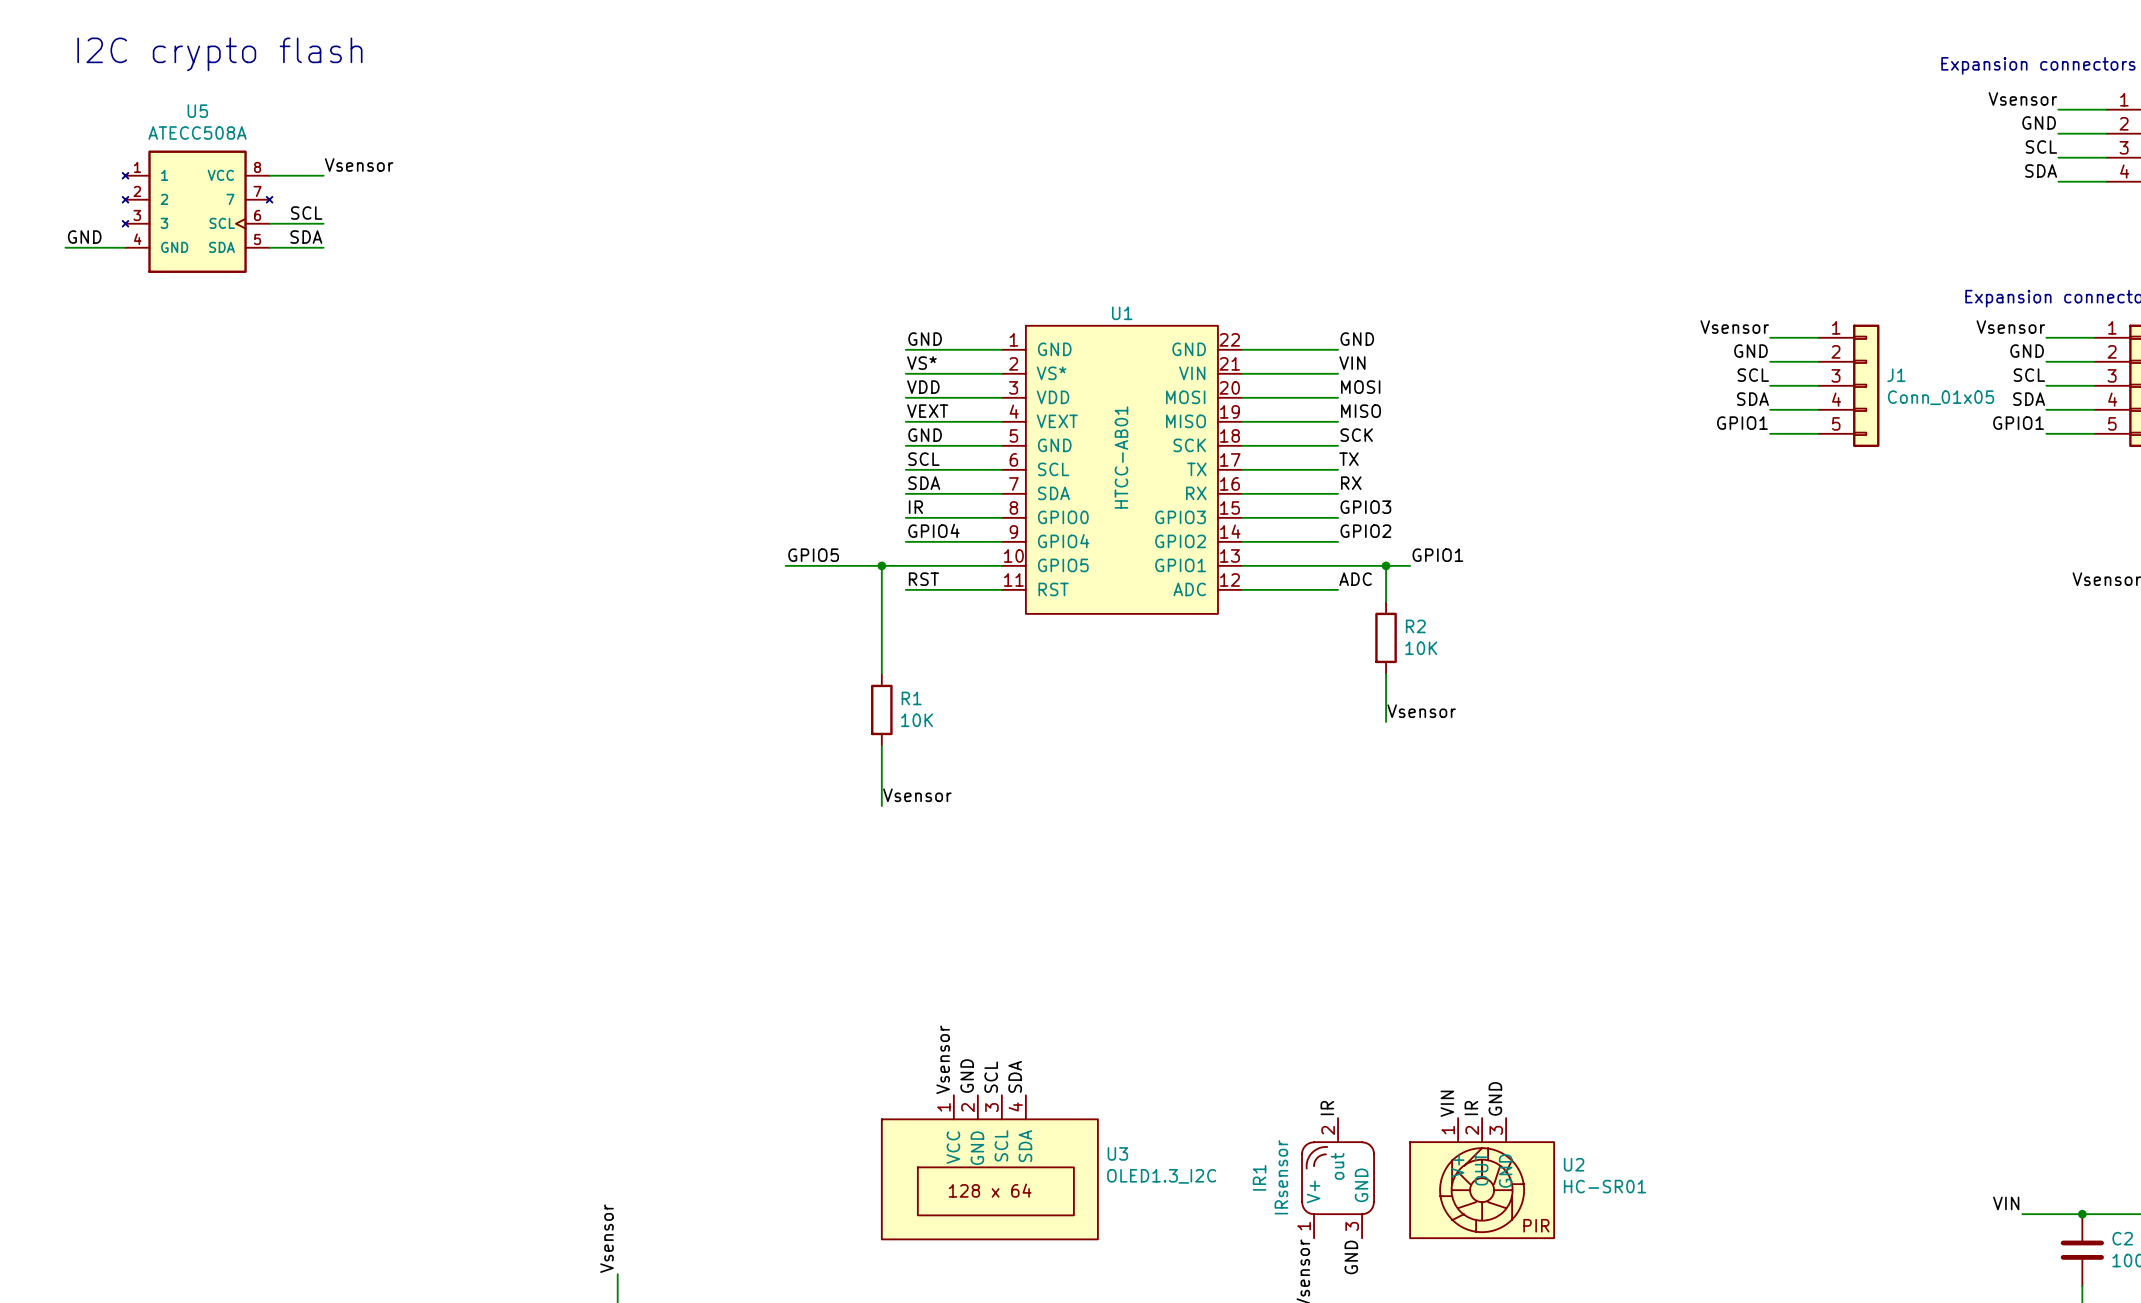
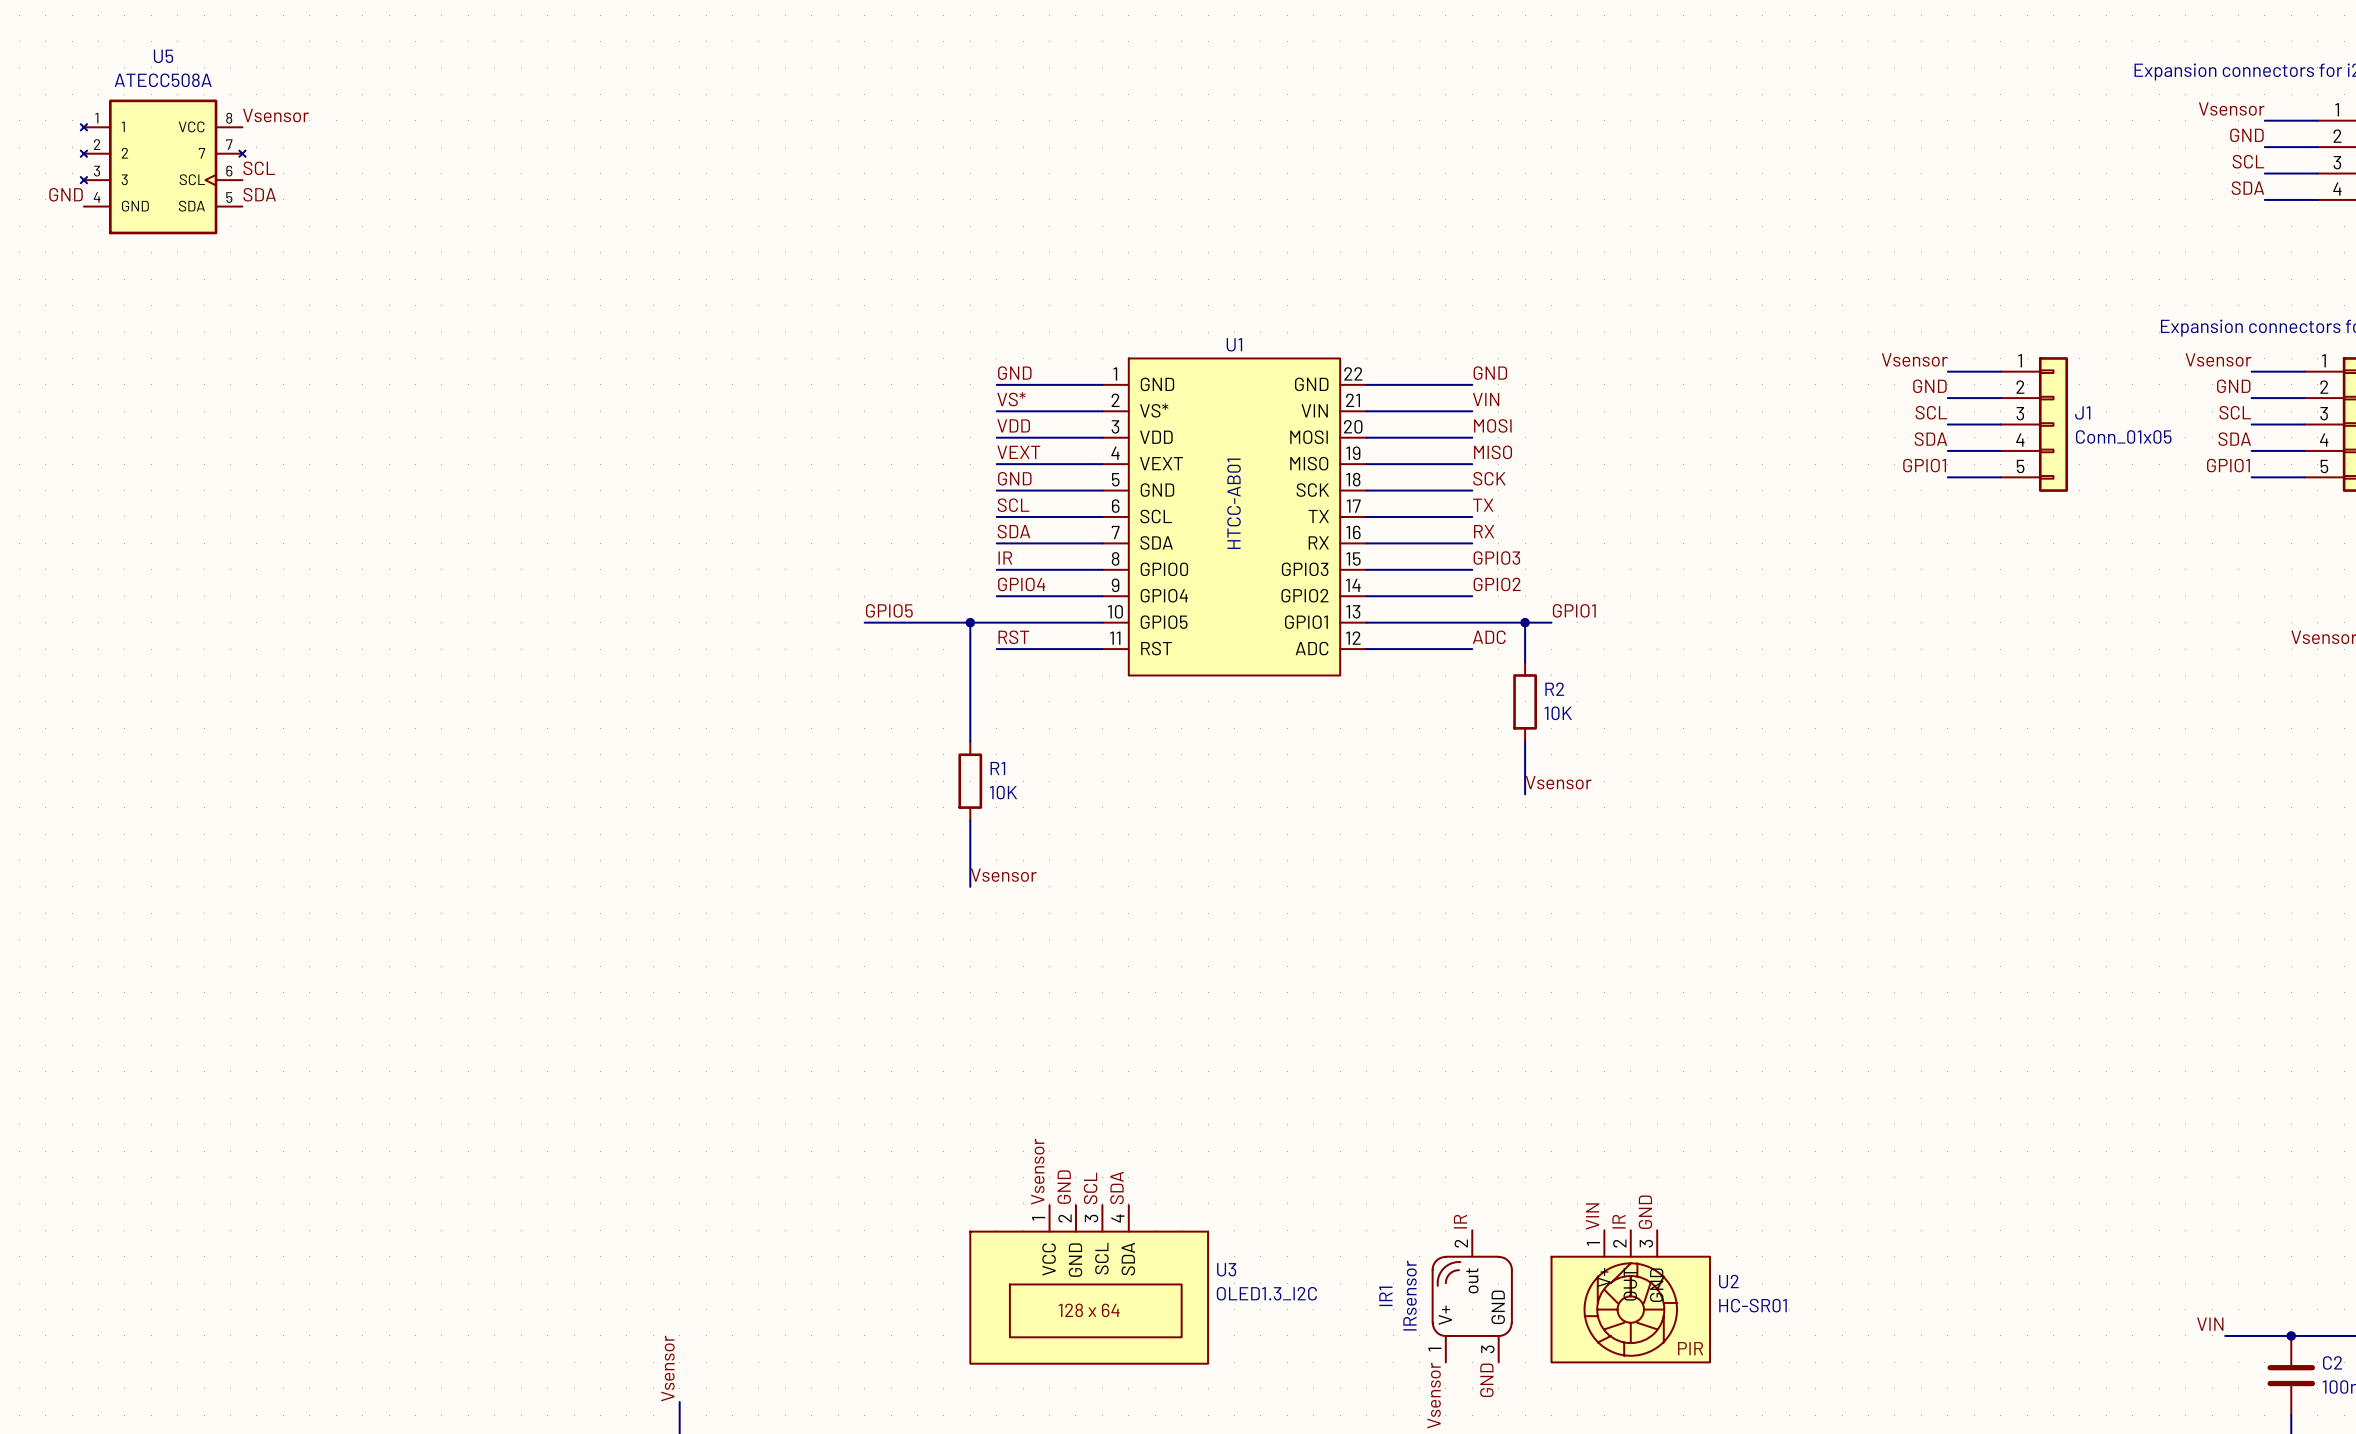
text: I2C crypto flash (219, 54) -> none
label position: Vsensor (359, 165) -> Vsensor (275, 115)
wire: (269, 175) (323, 175) -> none
U5 position: (197, 211) -> (163, 166)
label position: SCL (306, 213) -> SCL (259, 168)
wire: (269, 223) (323, 223) -> none
label position: GND (84, 237) -> GND (66, 194)
label position: SDA (306, 237) -> SDA (259, 194)
wire: (65, 247) (125, 247) -> none
wire: (269, 247) (323, 247) -> none

